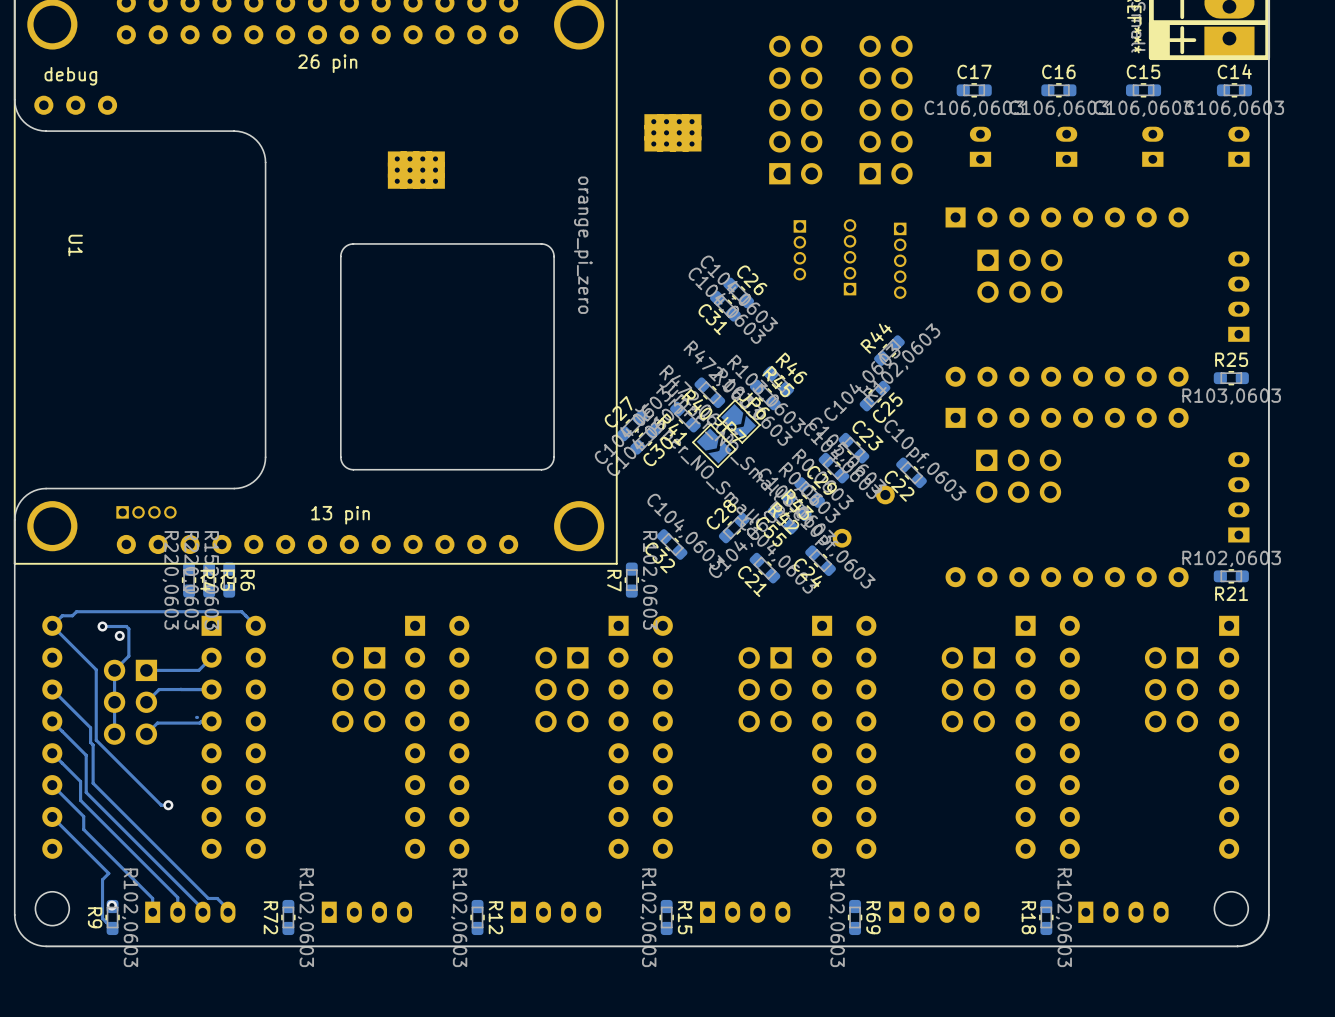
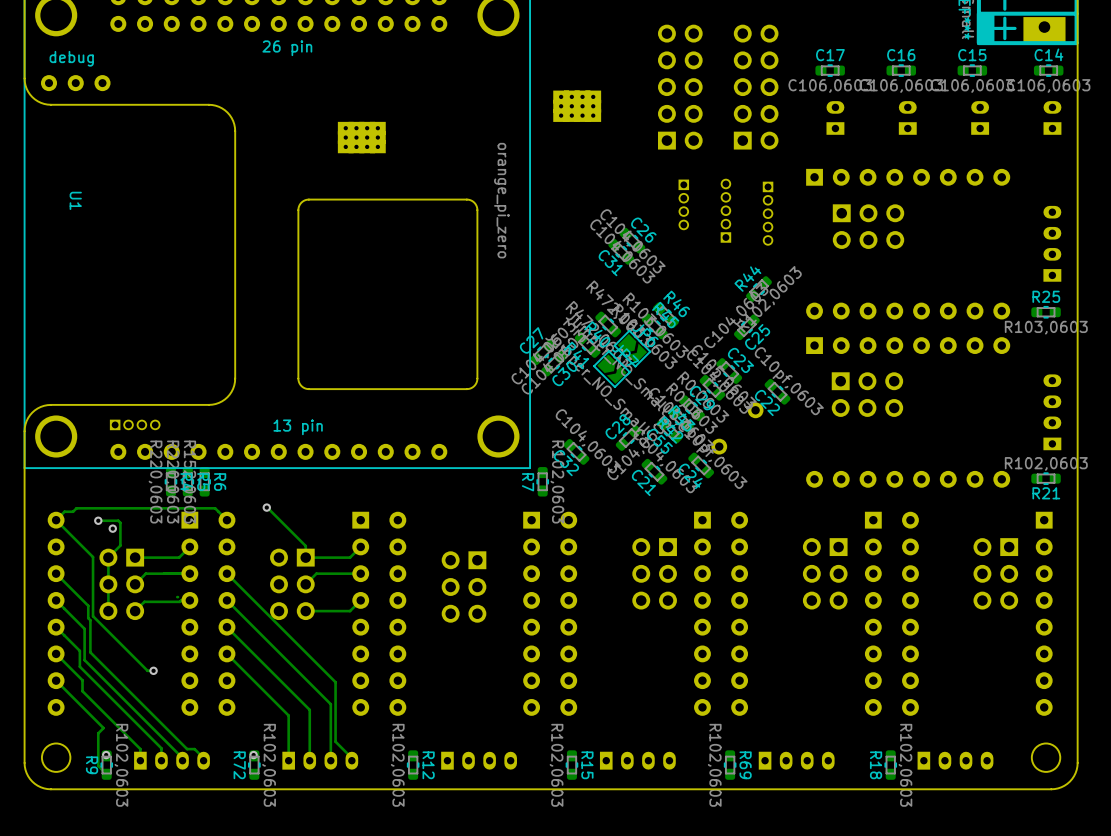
track: none -> (266, 507) (305, 546) (305, 557) (350, 557) (360, 546)
via: none -> (266, 507)
track: none -> (226, 573) (335, 682) (335, 741) (351, 758) (351, 760)
part position: (358, 689) -> (292, 584)
track: none -> (360, 573) (316, 573) (305, 584)
part position: (561, 689) -> (464, 586)
track: none -> (226, 600) (330, 704) (330, 760)
track: none -> (360, 600) (350, 611) (305, 611)
track: none -> (226, 627) (309, 709) (309, 760)
track: none -> (226, 653) (288, 715) (288, 760)
via: none -> (253, 755)

